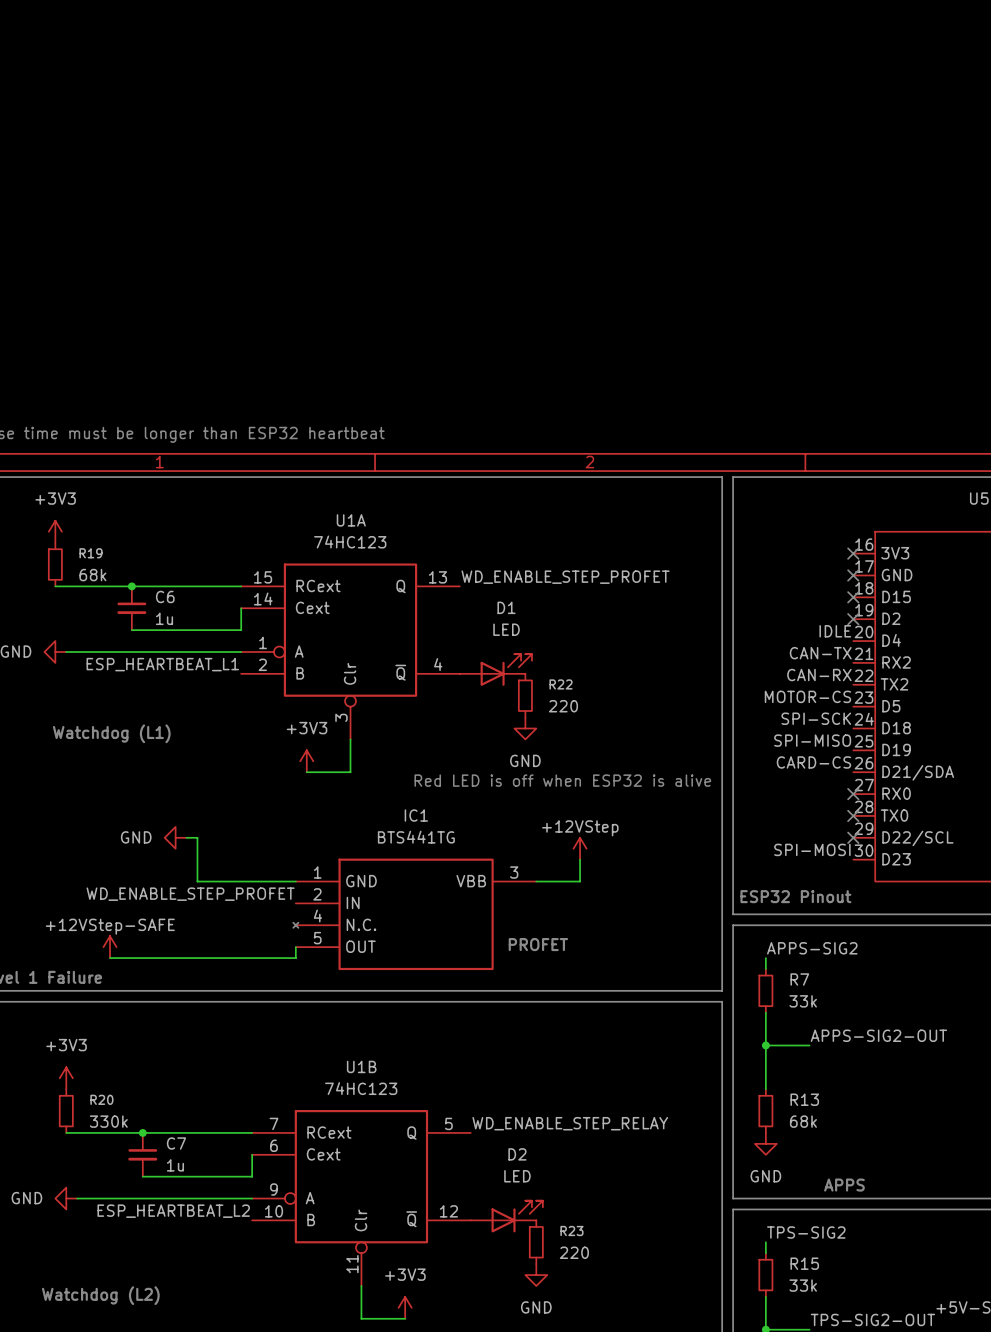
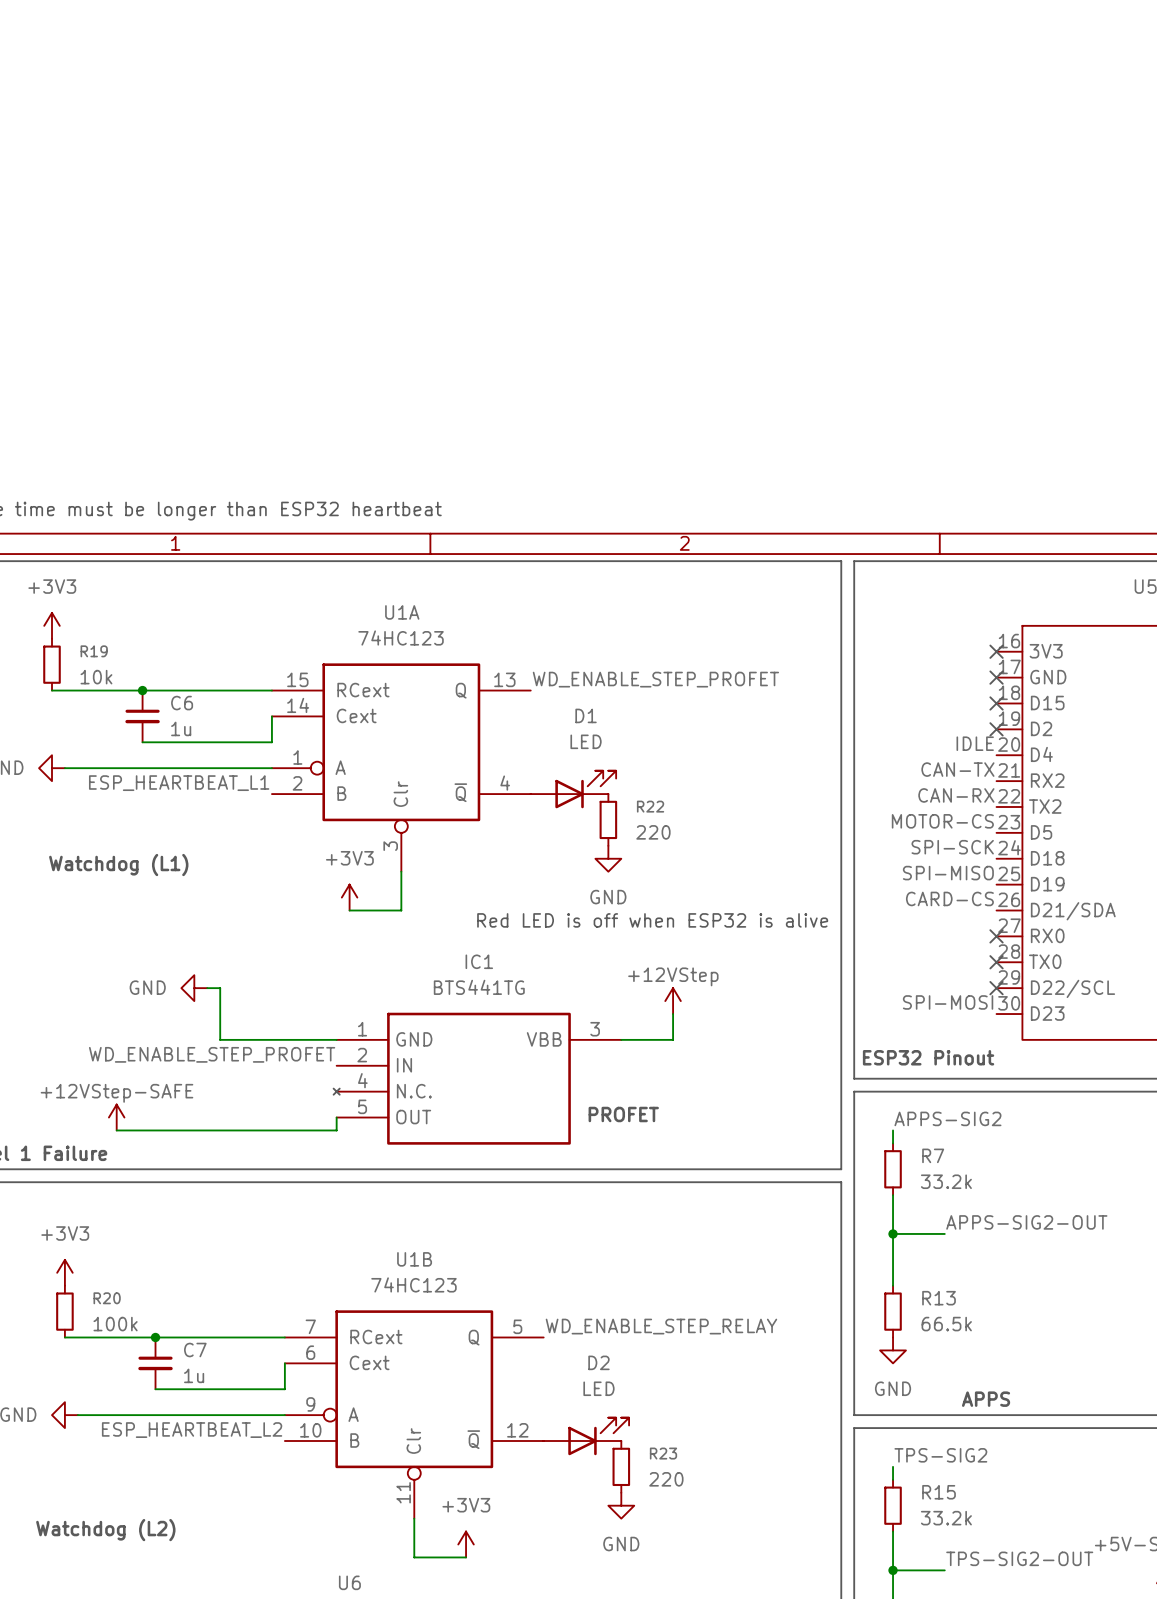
R19 value: 68k (92, 575) -> 10k (96, 677)
R7 value: 33k (803, 1001) -> 33.2k (946, 1181)
R20 value: 330k (108, 1121) -> 100k (115, 1324)
R13 value: 68k (803, 1121) -> 66.5k (946, 1324)
R15 value: 33k (803, 1285) -> 33.2k (946, 1518)

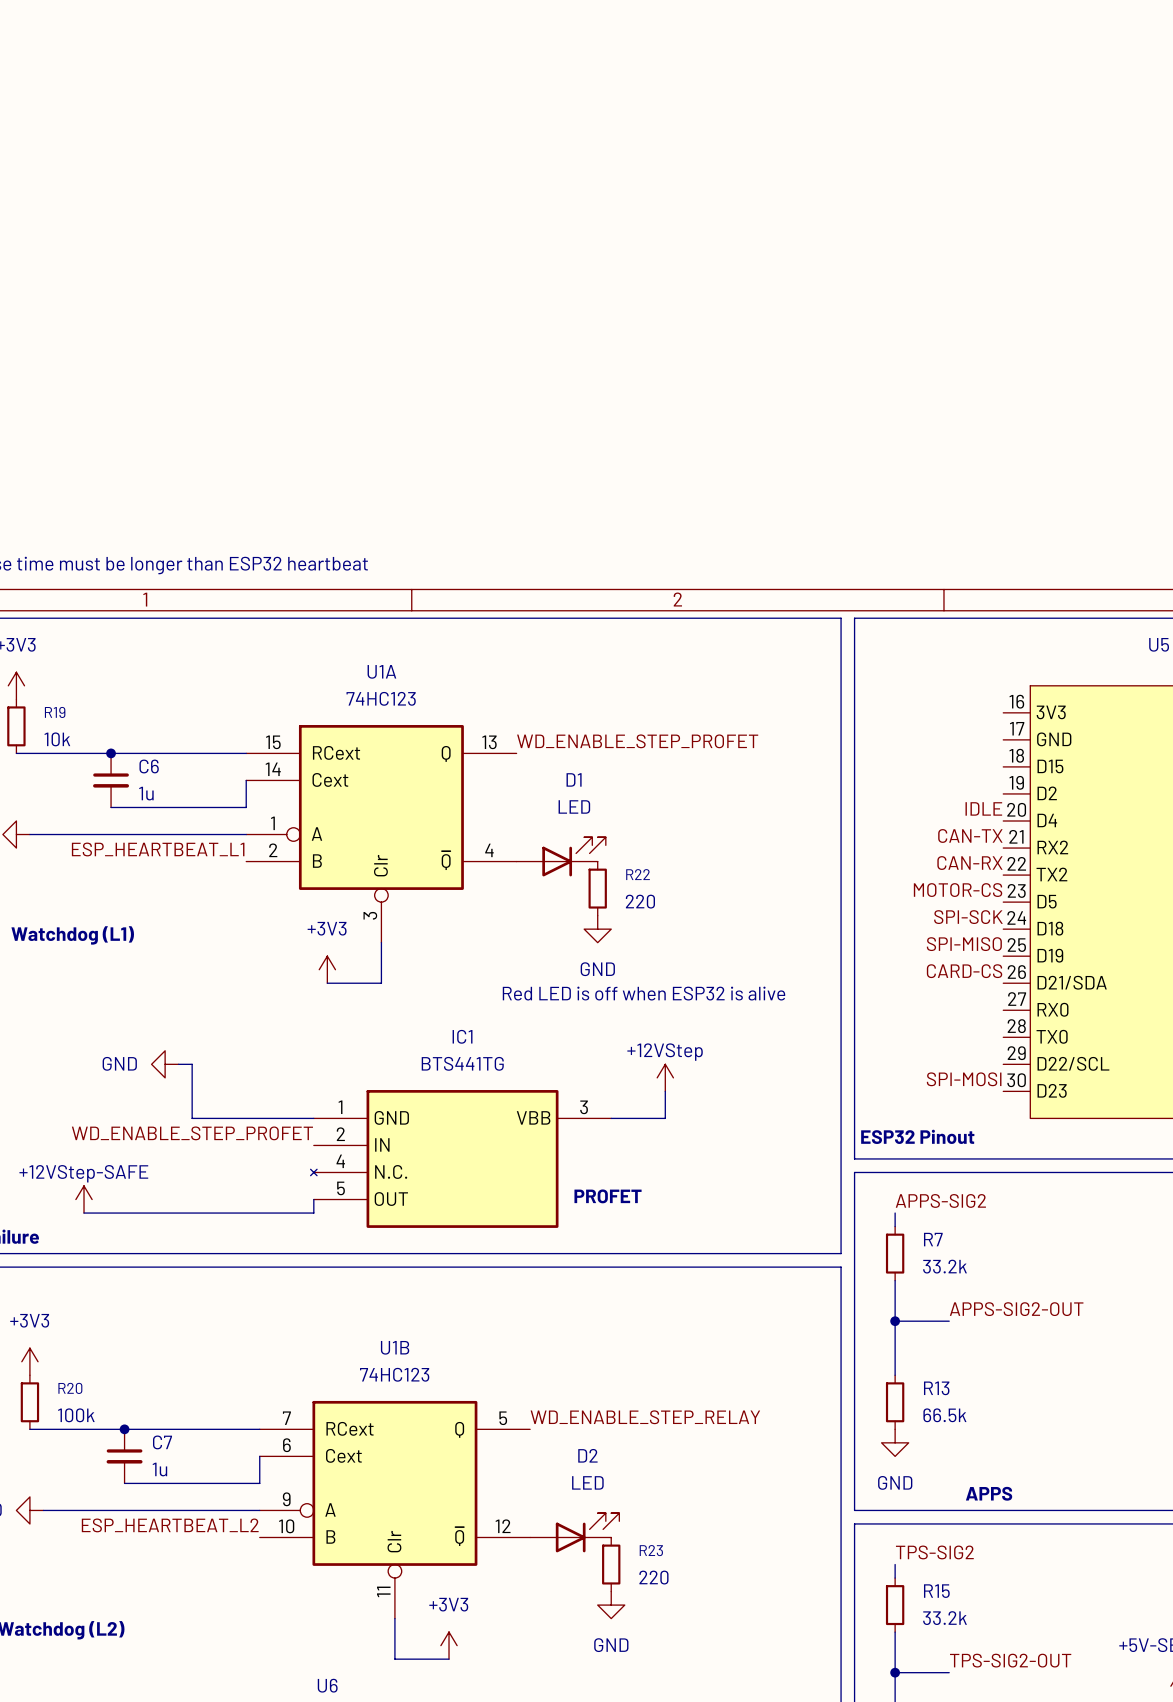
no-connect mark: (996, 651) -> none
no-connect mark: (996, 677) -> none
no-connect mark: (996, 703) -> none
no-connect mark: (996, 729) -> none
no-connect mark: (996, 936) -> none
no-connect mark: (996, 962) -> none
no-connect mark: (996, 988) -> none

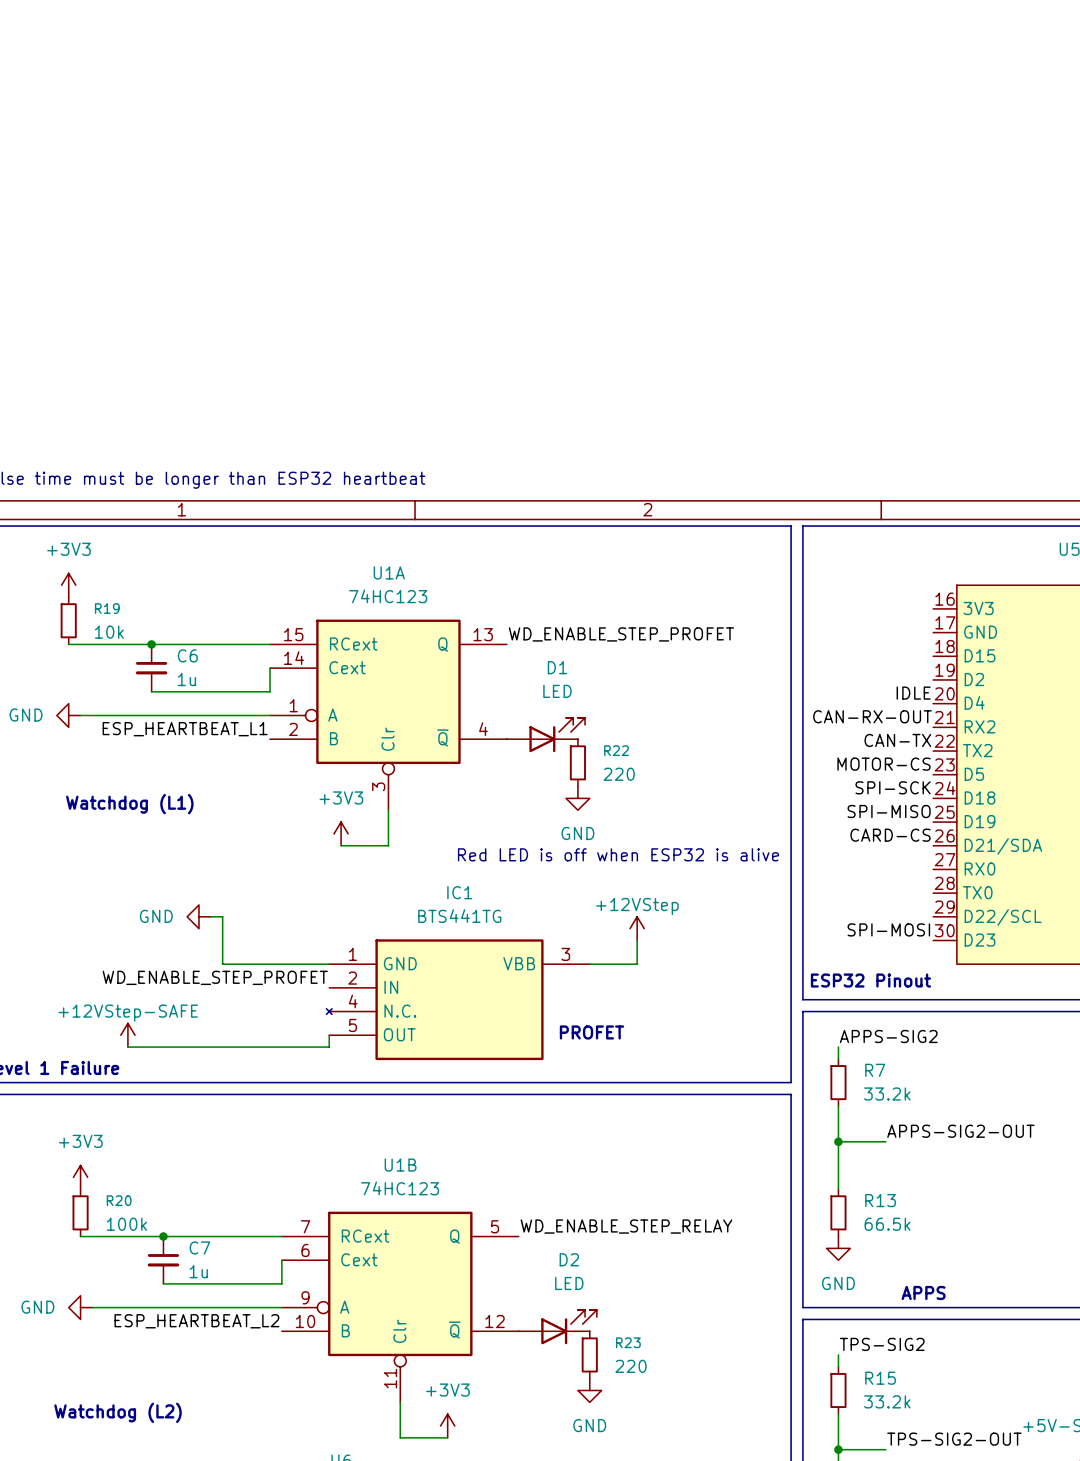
label: CAN-TX (970, 835) -> CAN-RX-OUT (872, 716)
label: CAN-RX (969, 863) -> CAN-TX (897, 740)

